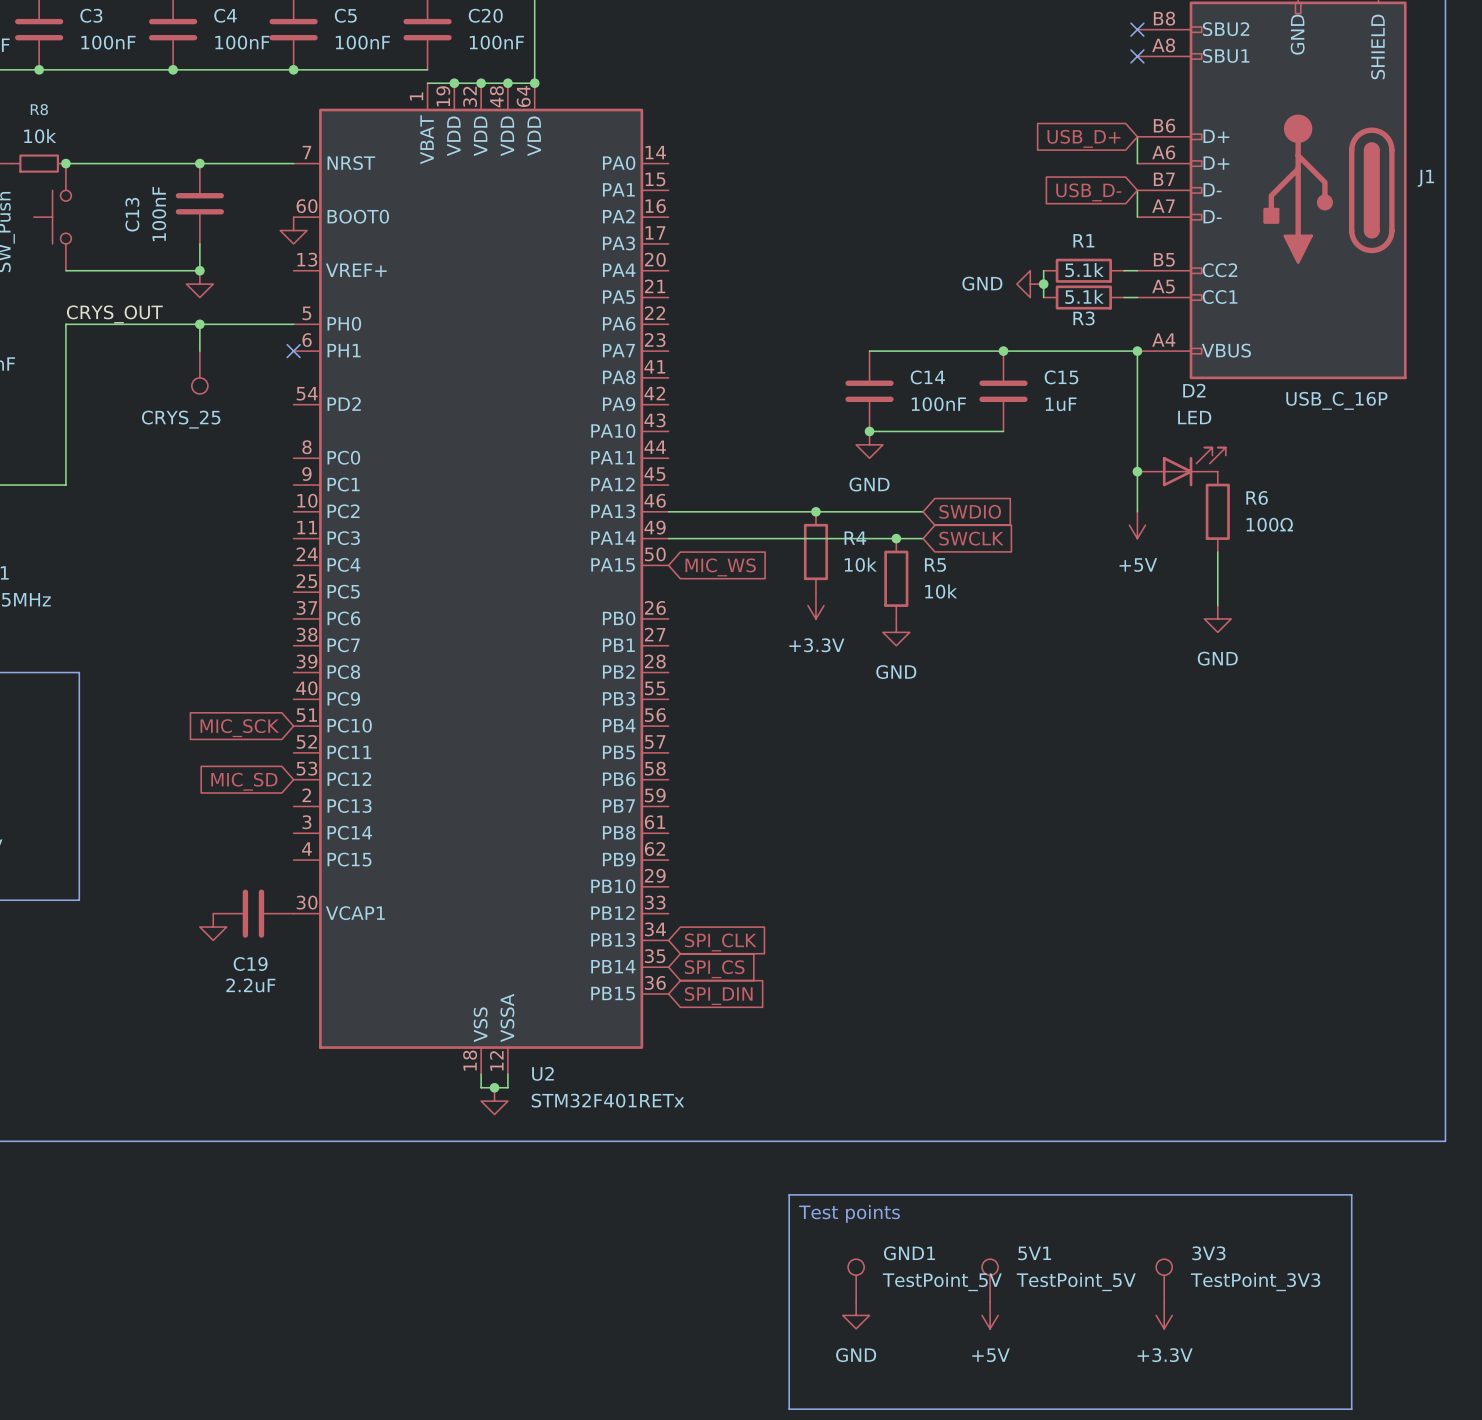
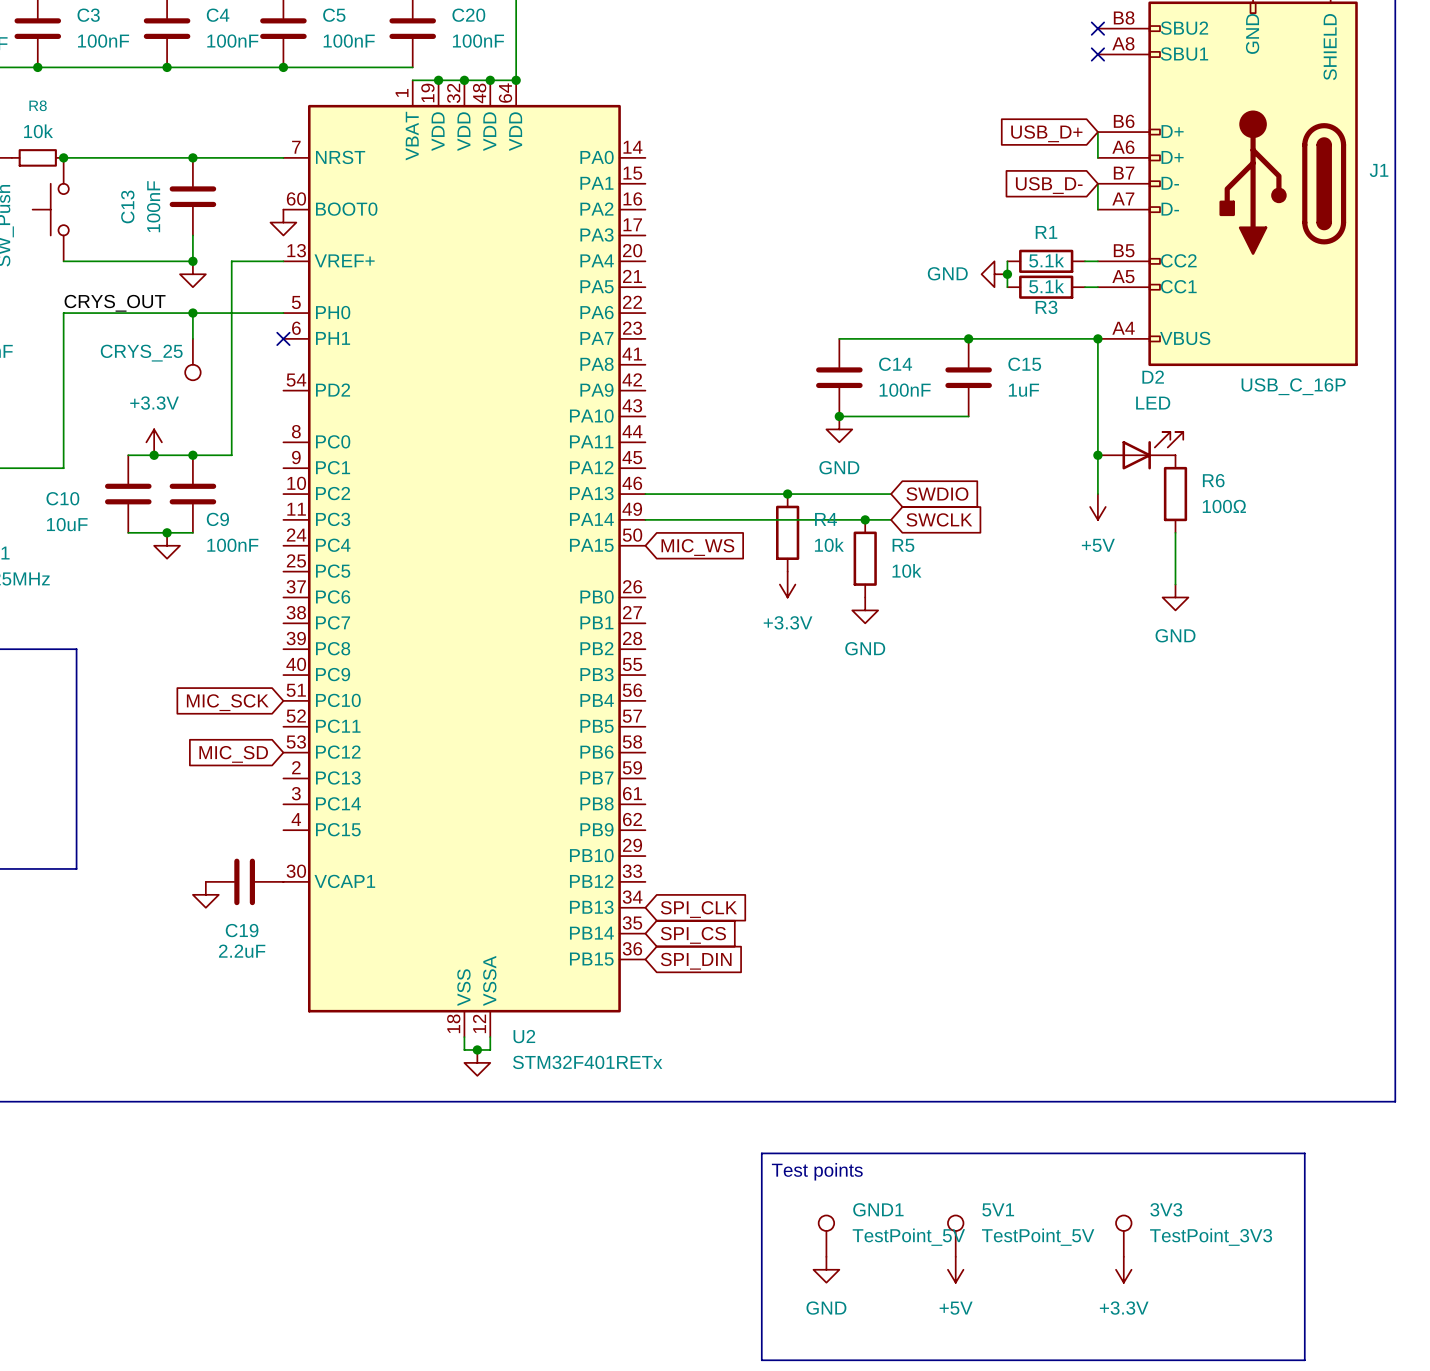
wire: none -> (283, 261) (231, 261) (231, 455) (128, 455)
CRYS_25 name position: CRYS_25 (181, 419) -> CRYS_25 (141, 353)
power symbol: none -> +3.3V (154, 442)
junction: none -> (154, 455)
junction: none -> (192, 455)
C10: none -> 10uF (128, 494)
C9: none -> 100nF (192, 494)
wire: none -> (128, 532) (192, 532)
junction: none -> (167, 532)
power symbol: none -> (167, 545)

